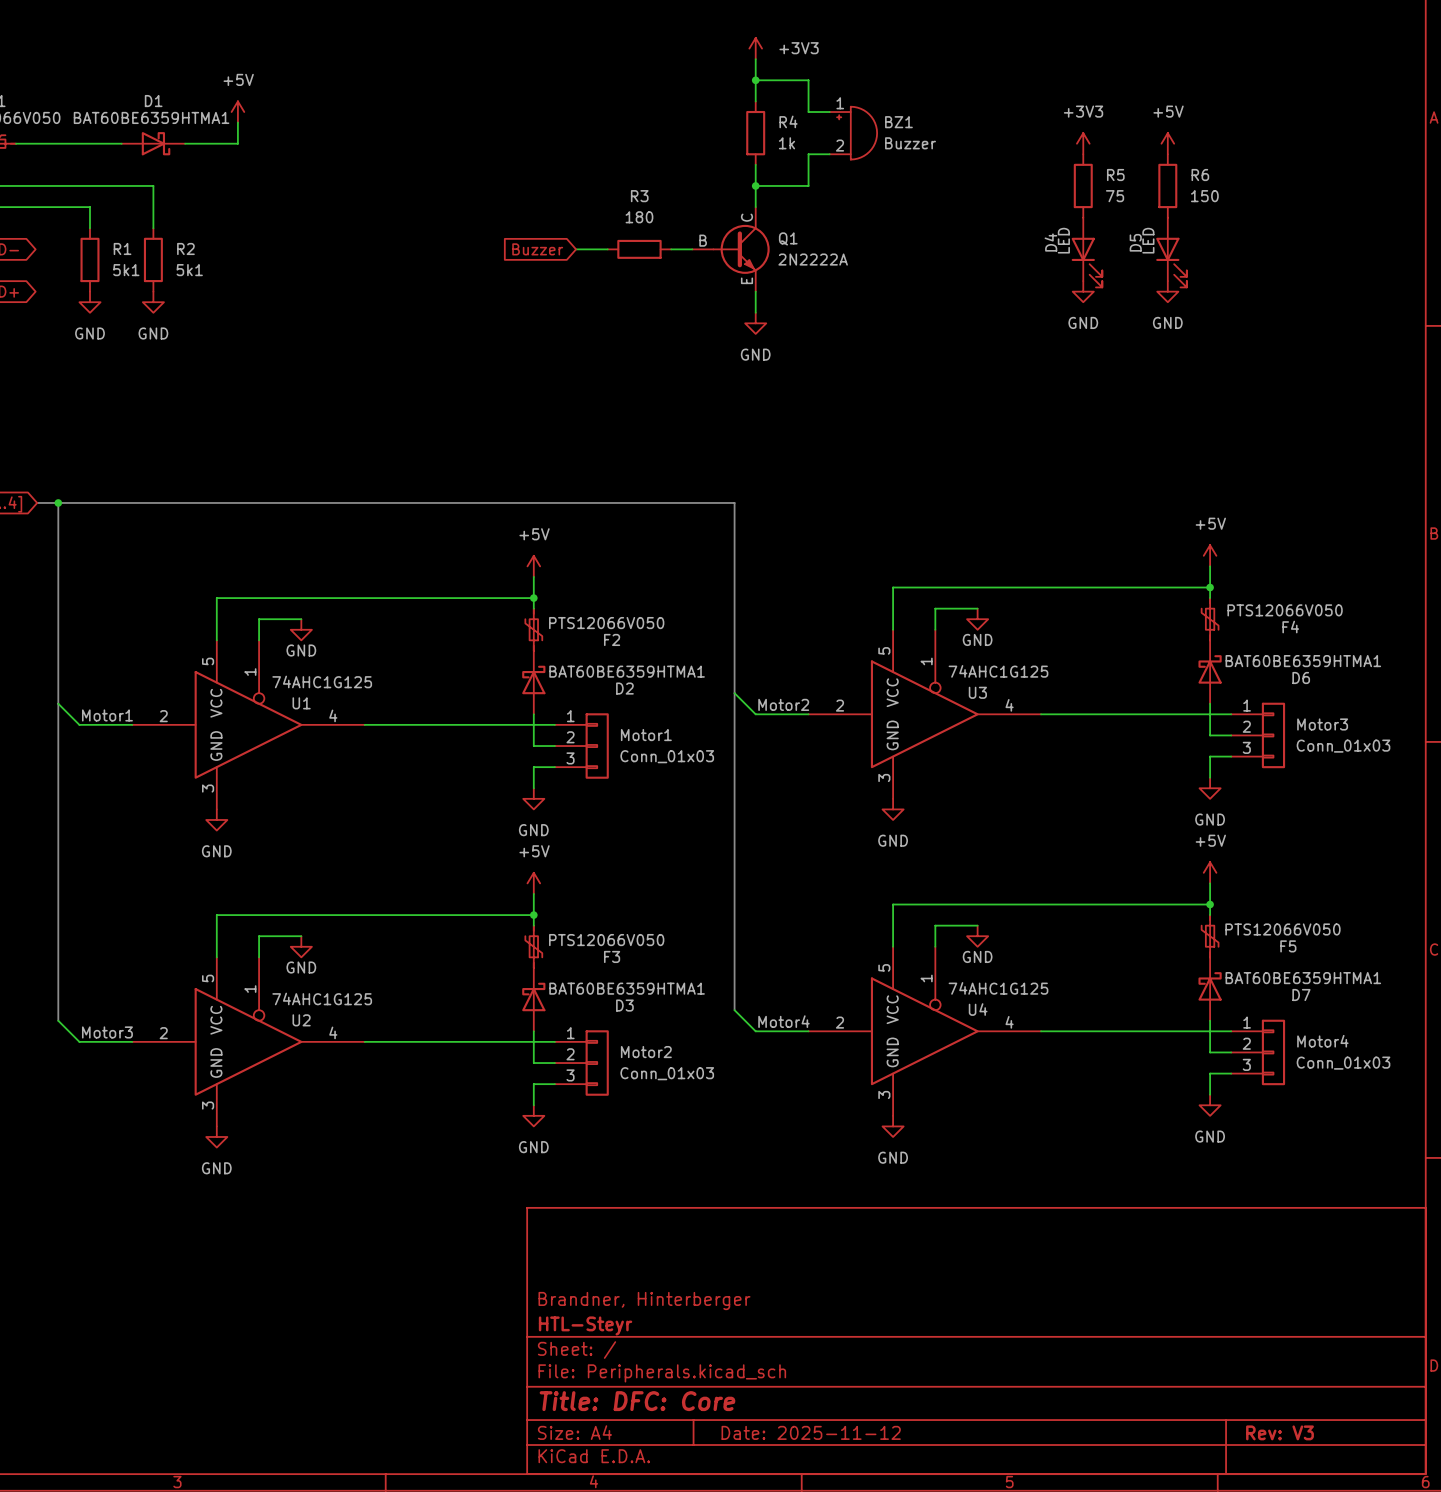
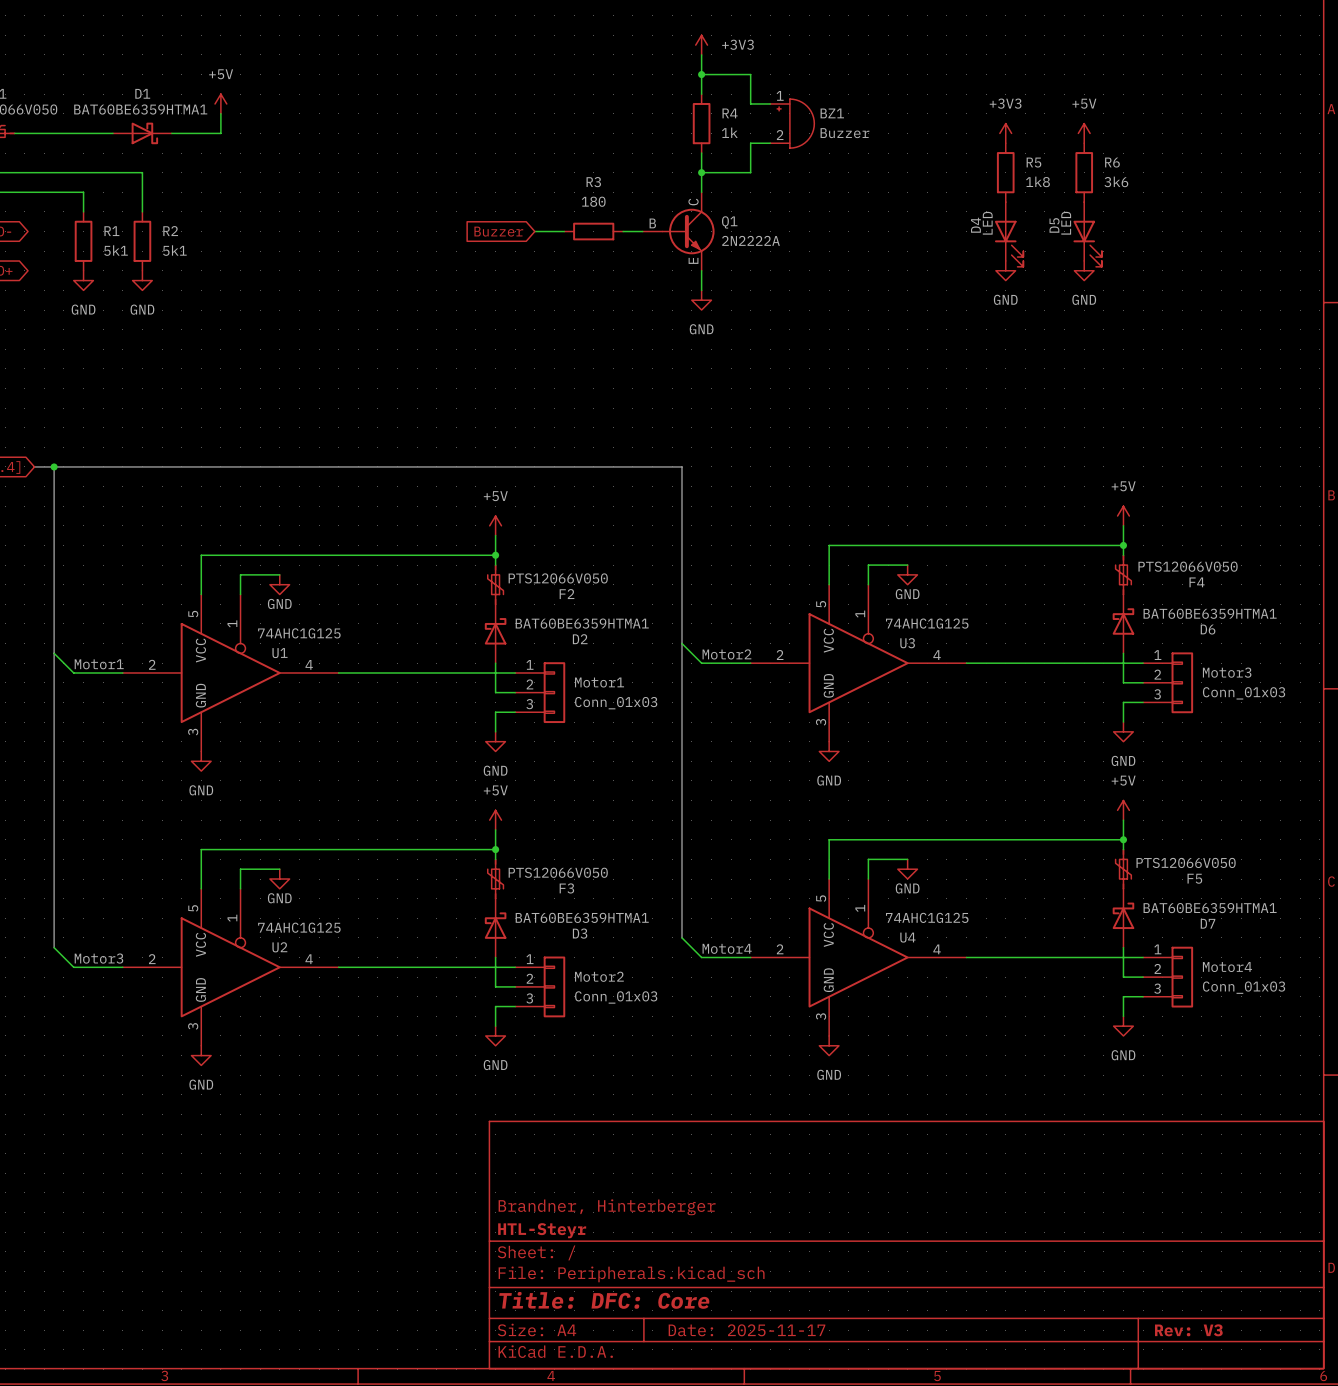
R5 value: 75 (1115, 196) -> 1k8 (1037, 181)
R6 value: 150 (1204, 196) -> 3k6 (1116, 181)
title block: Date: 2025-11-12 (811, 1432) -> Date: 2025-11-17 (746, 1330)

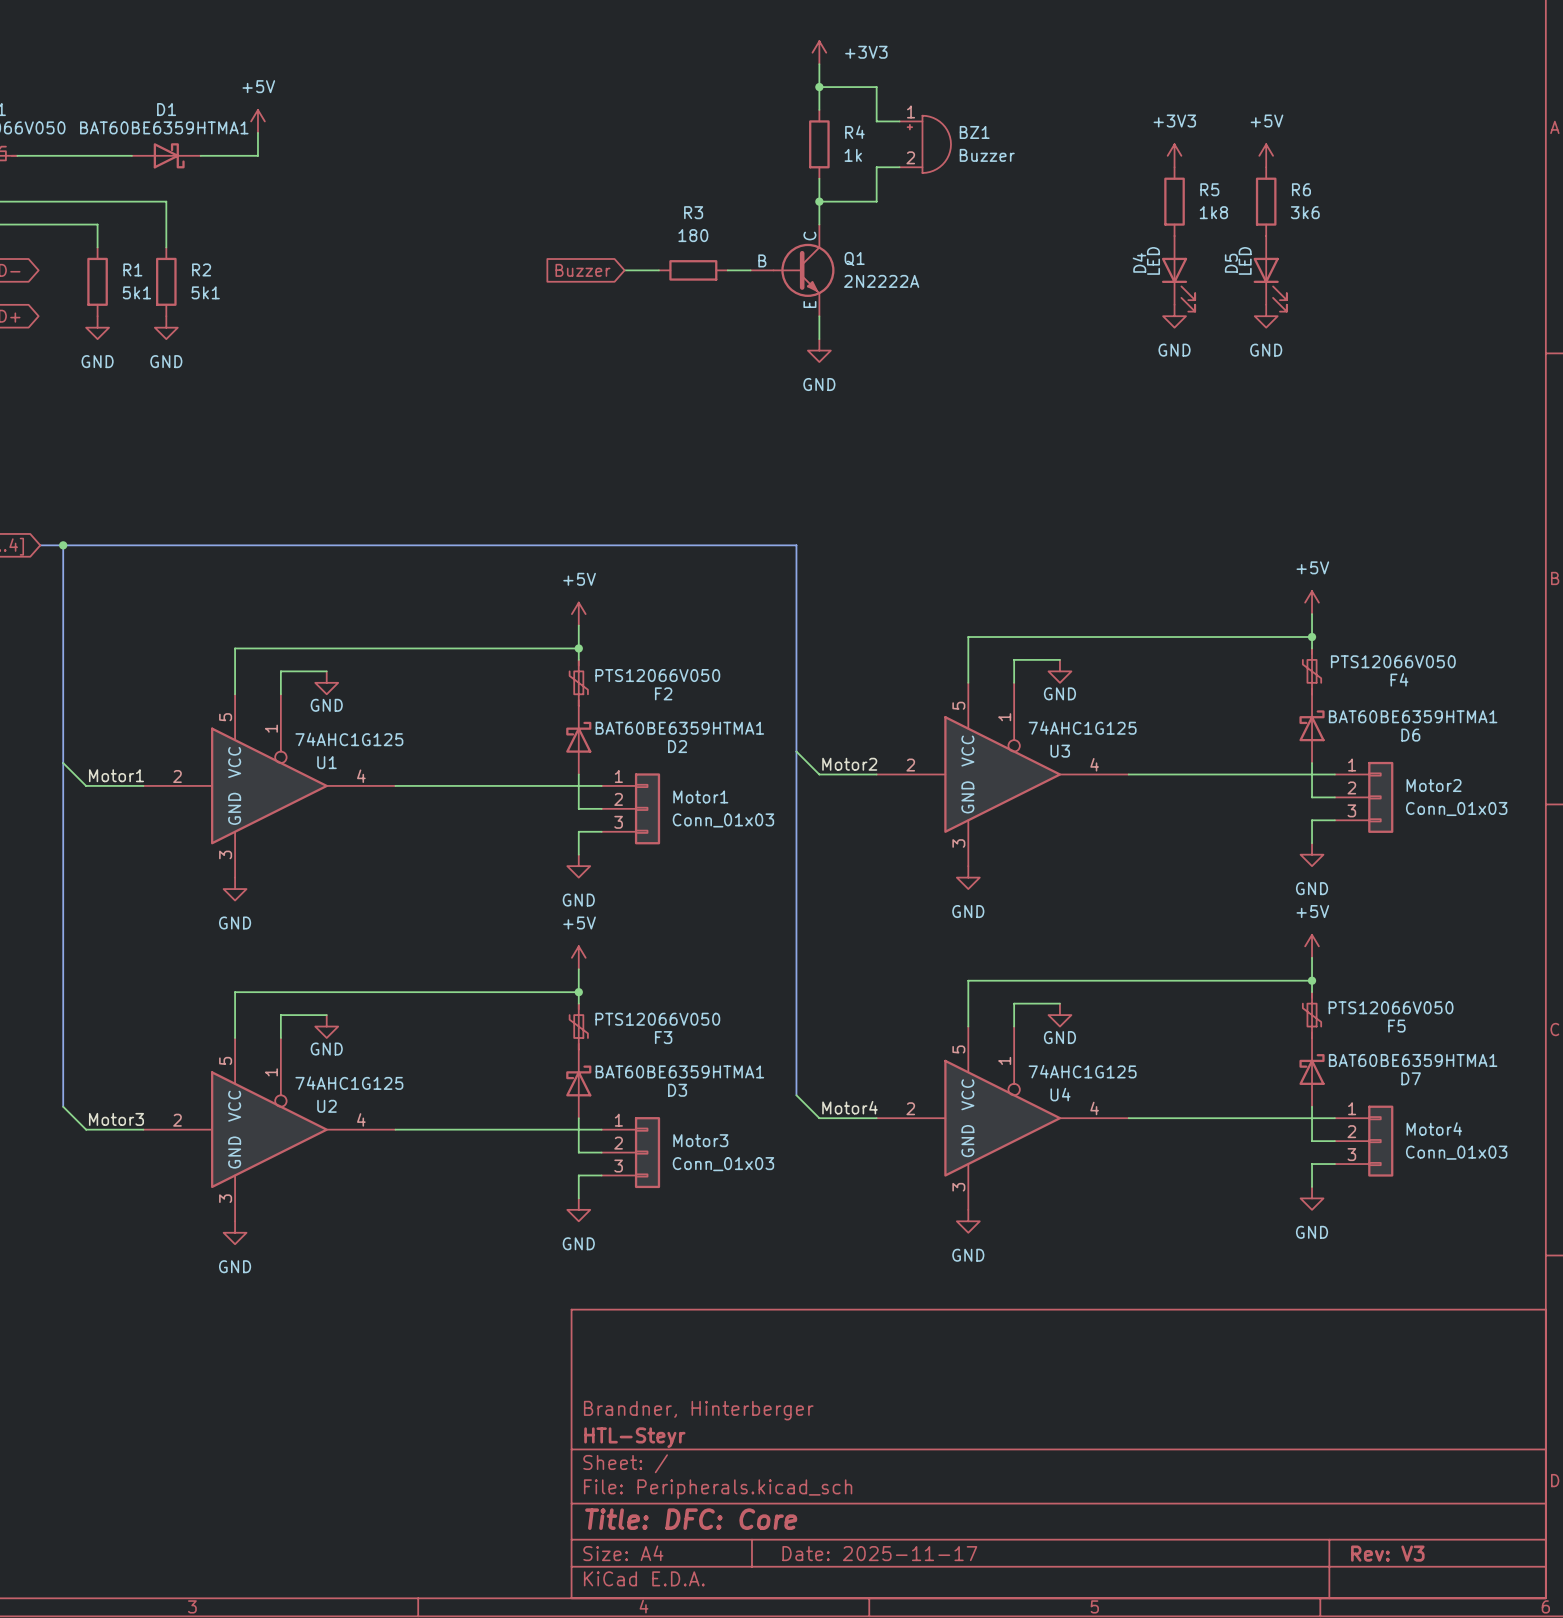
Motor3 name: Motor3 (1227, 672) -> Motor2 (1434, 785)
Motor2 name: Motor2 (599, 976) -> Motor3 (700, 1140)

